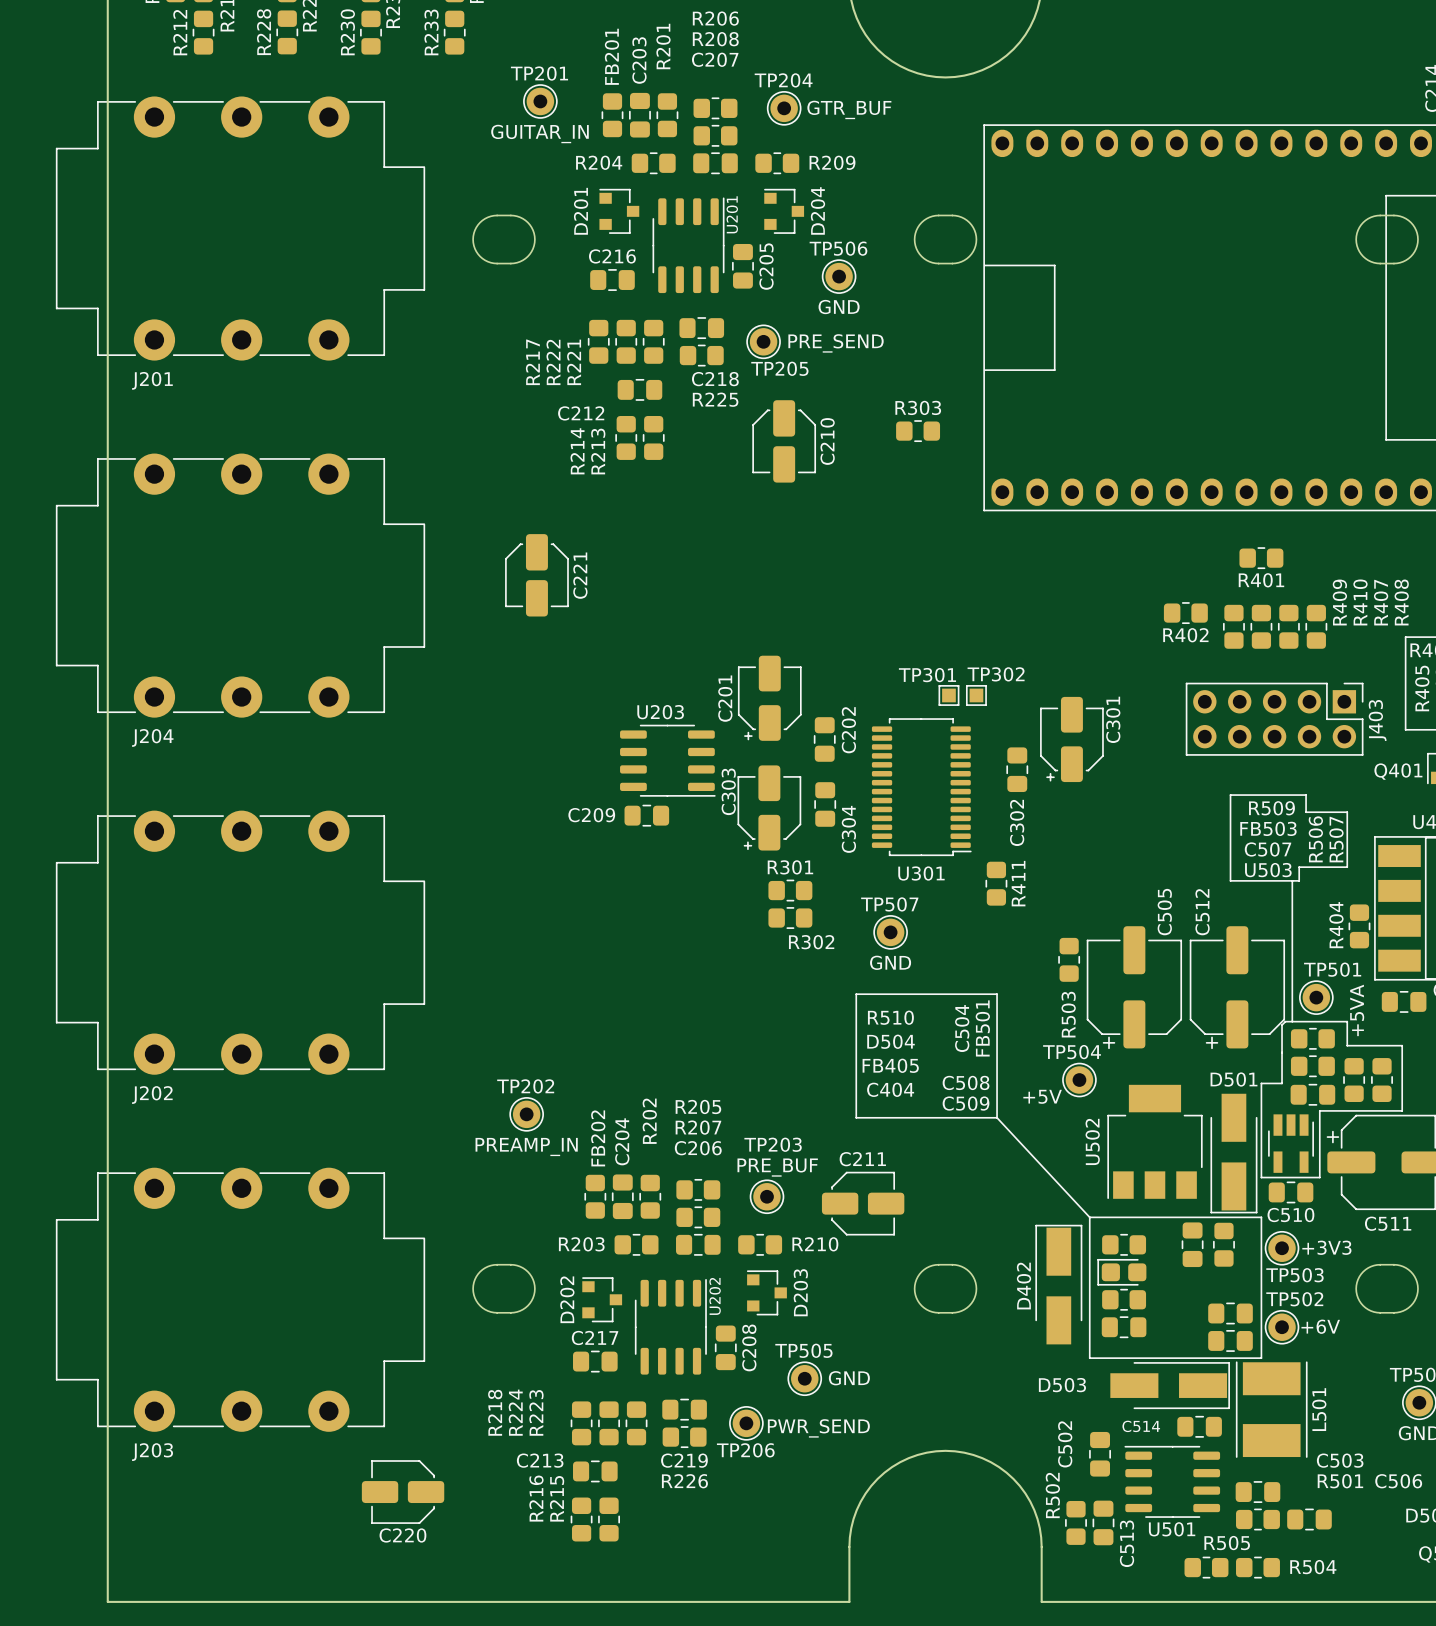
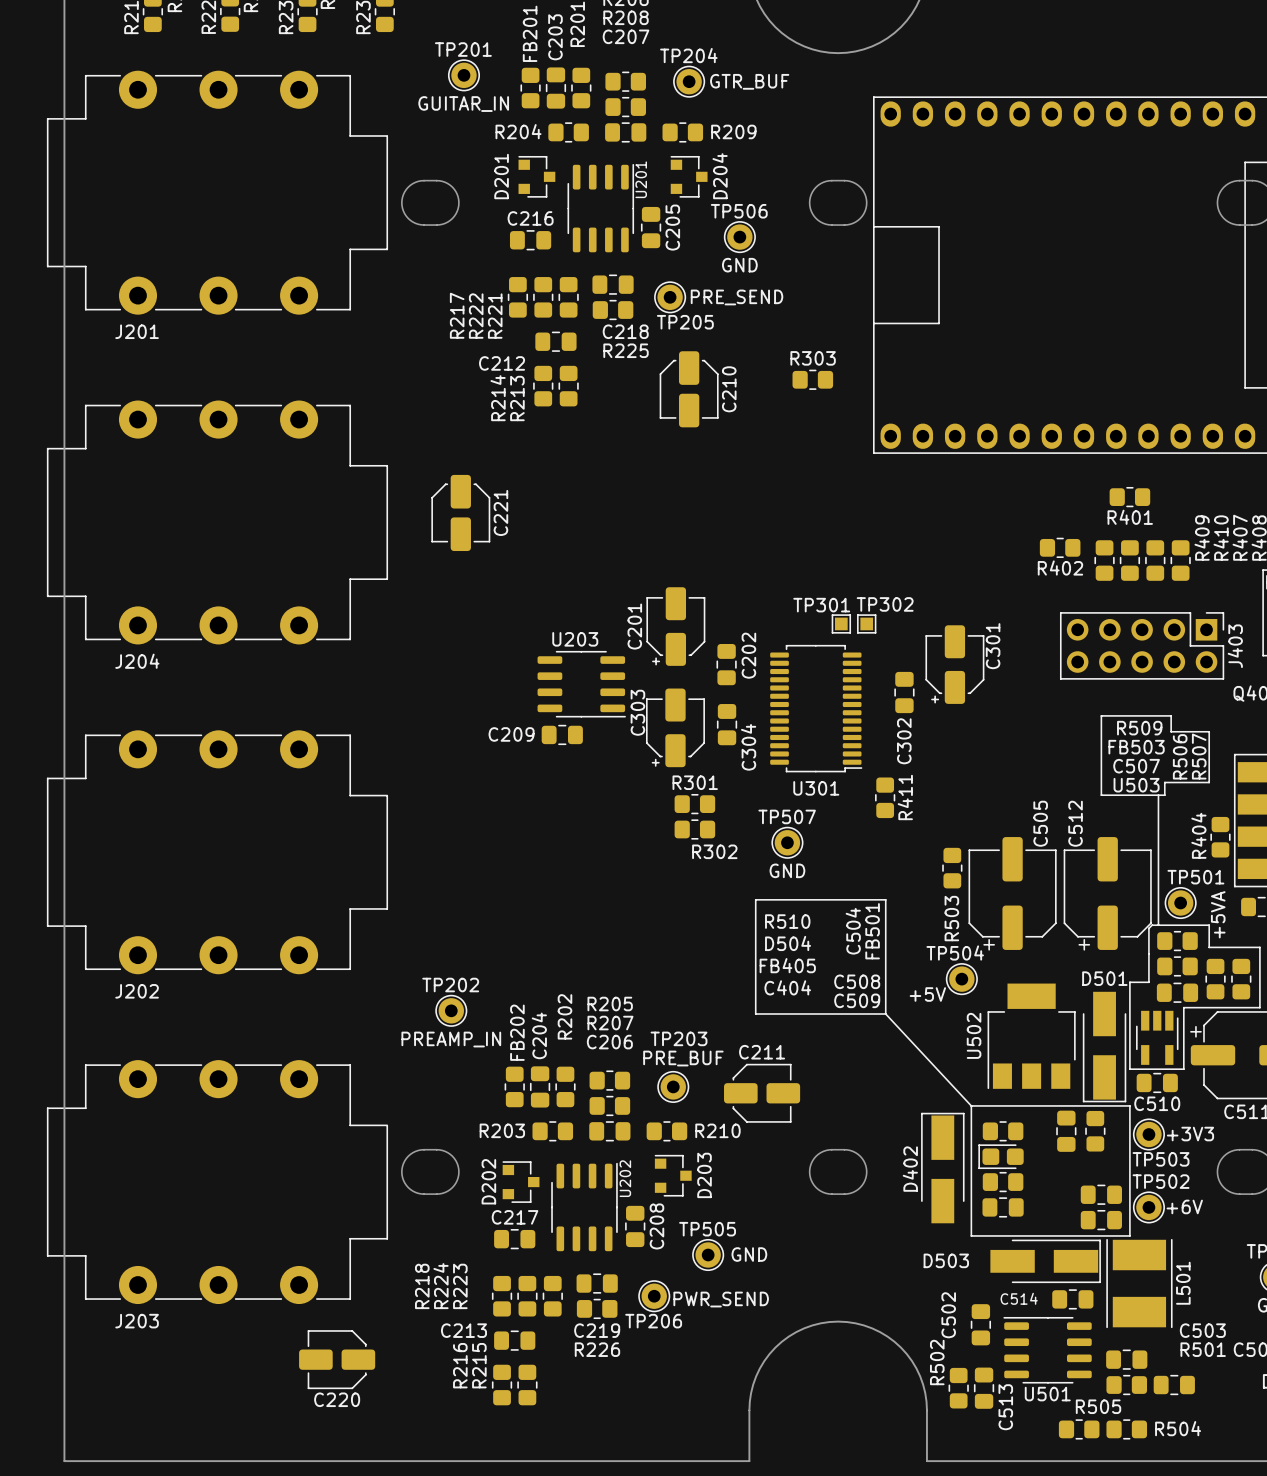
J201 position: (240, 228) -> (217, 192)
J204 position: (240, 585) -> (217, 522)
J202 position: (240, 942) -> (217, 852)
J203 position: (240, 1299) -> (217, 1182)

